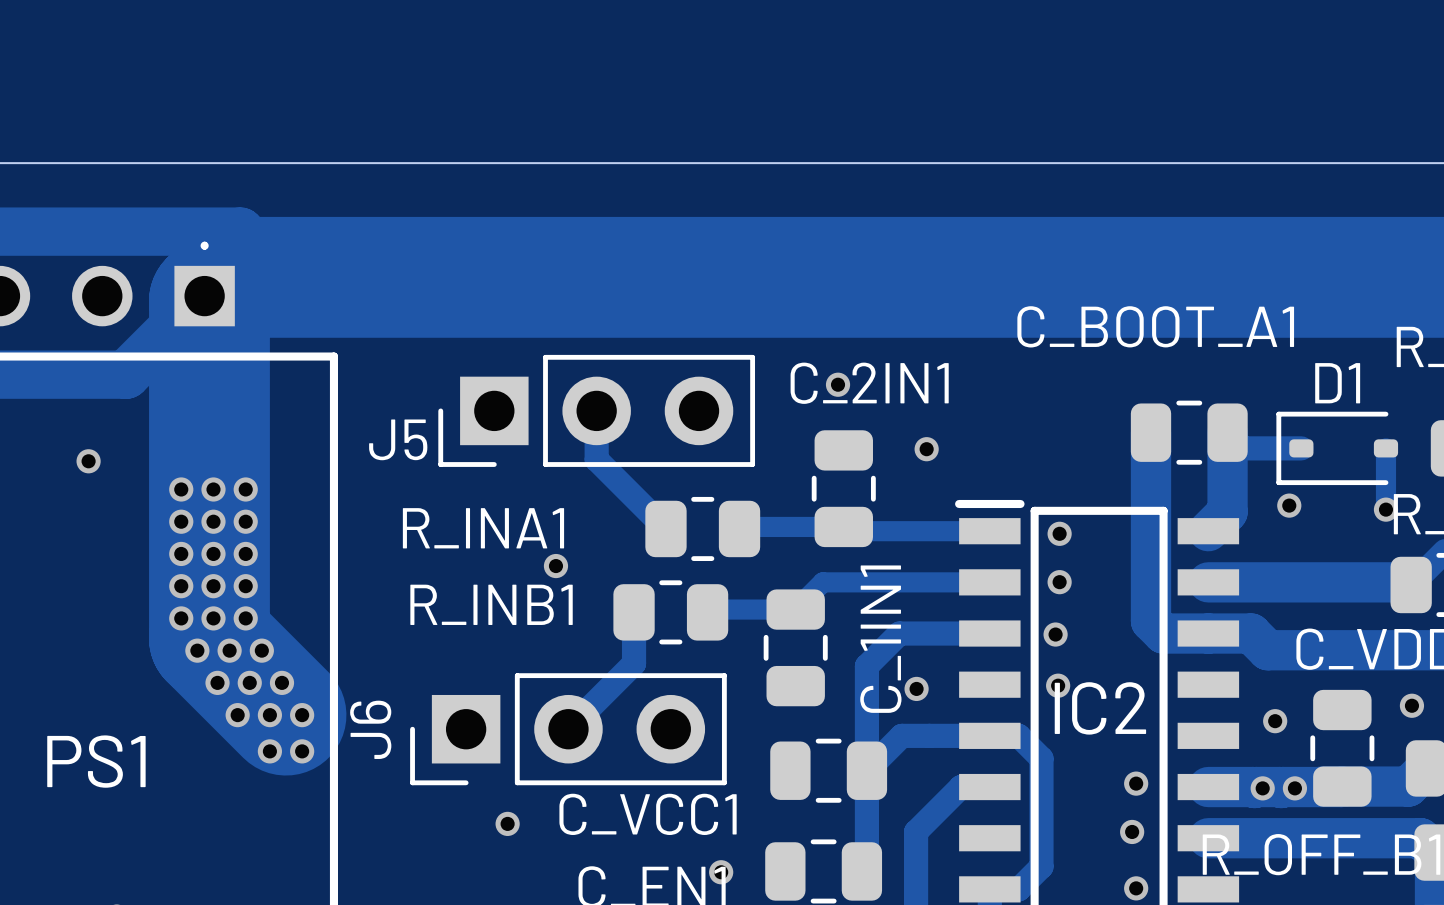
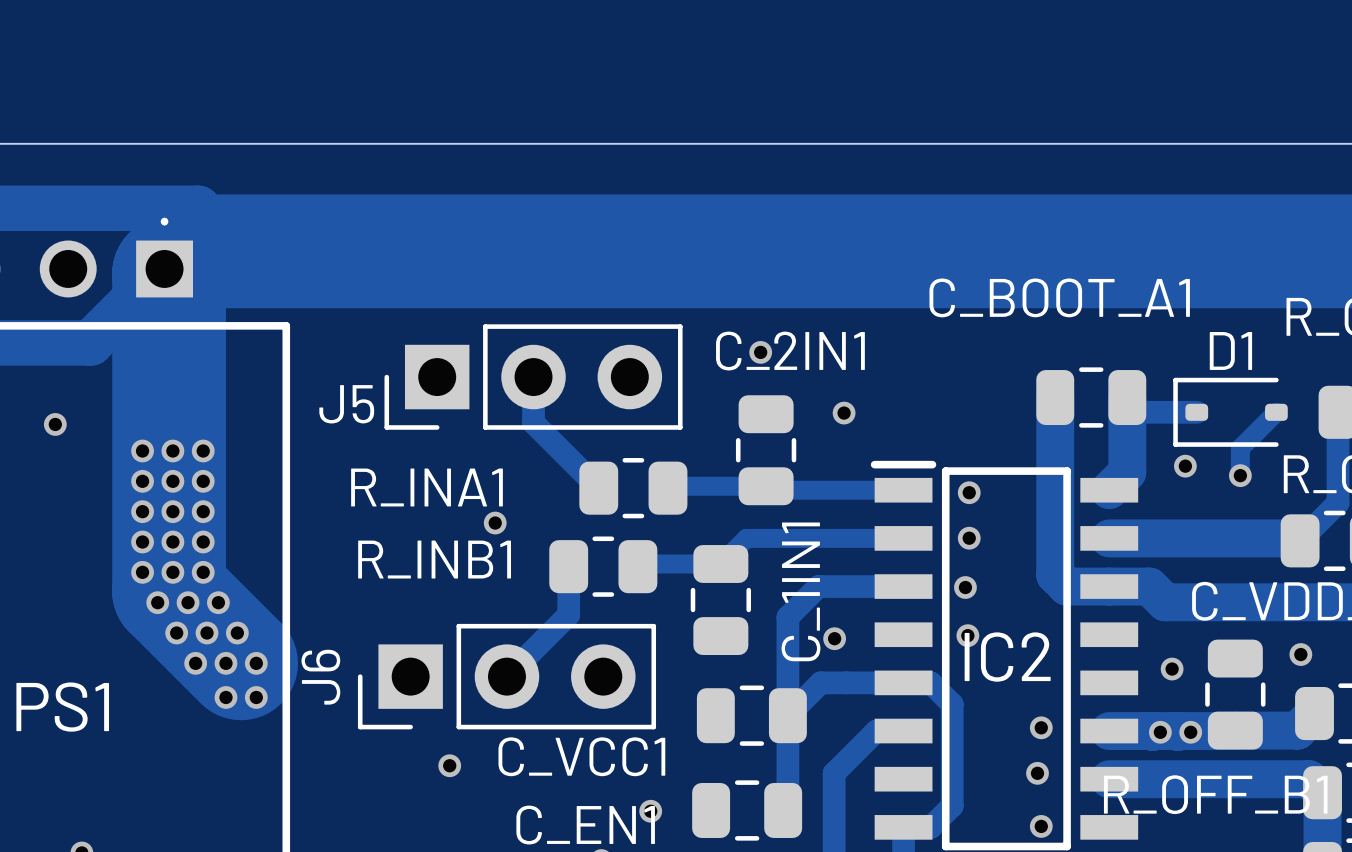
track: (1385, 448) (1385, 509) -> (1276, 412) (1240, 448) (1240, 475)
via position: (1385, 509) -> (1240, 475)

